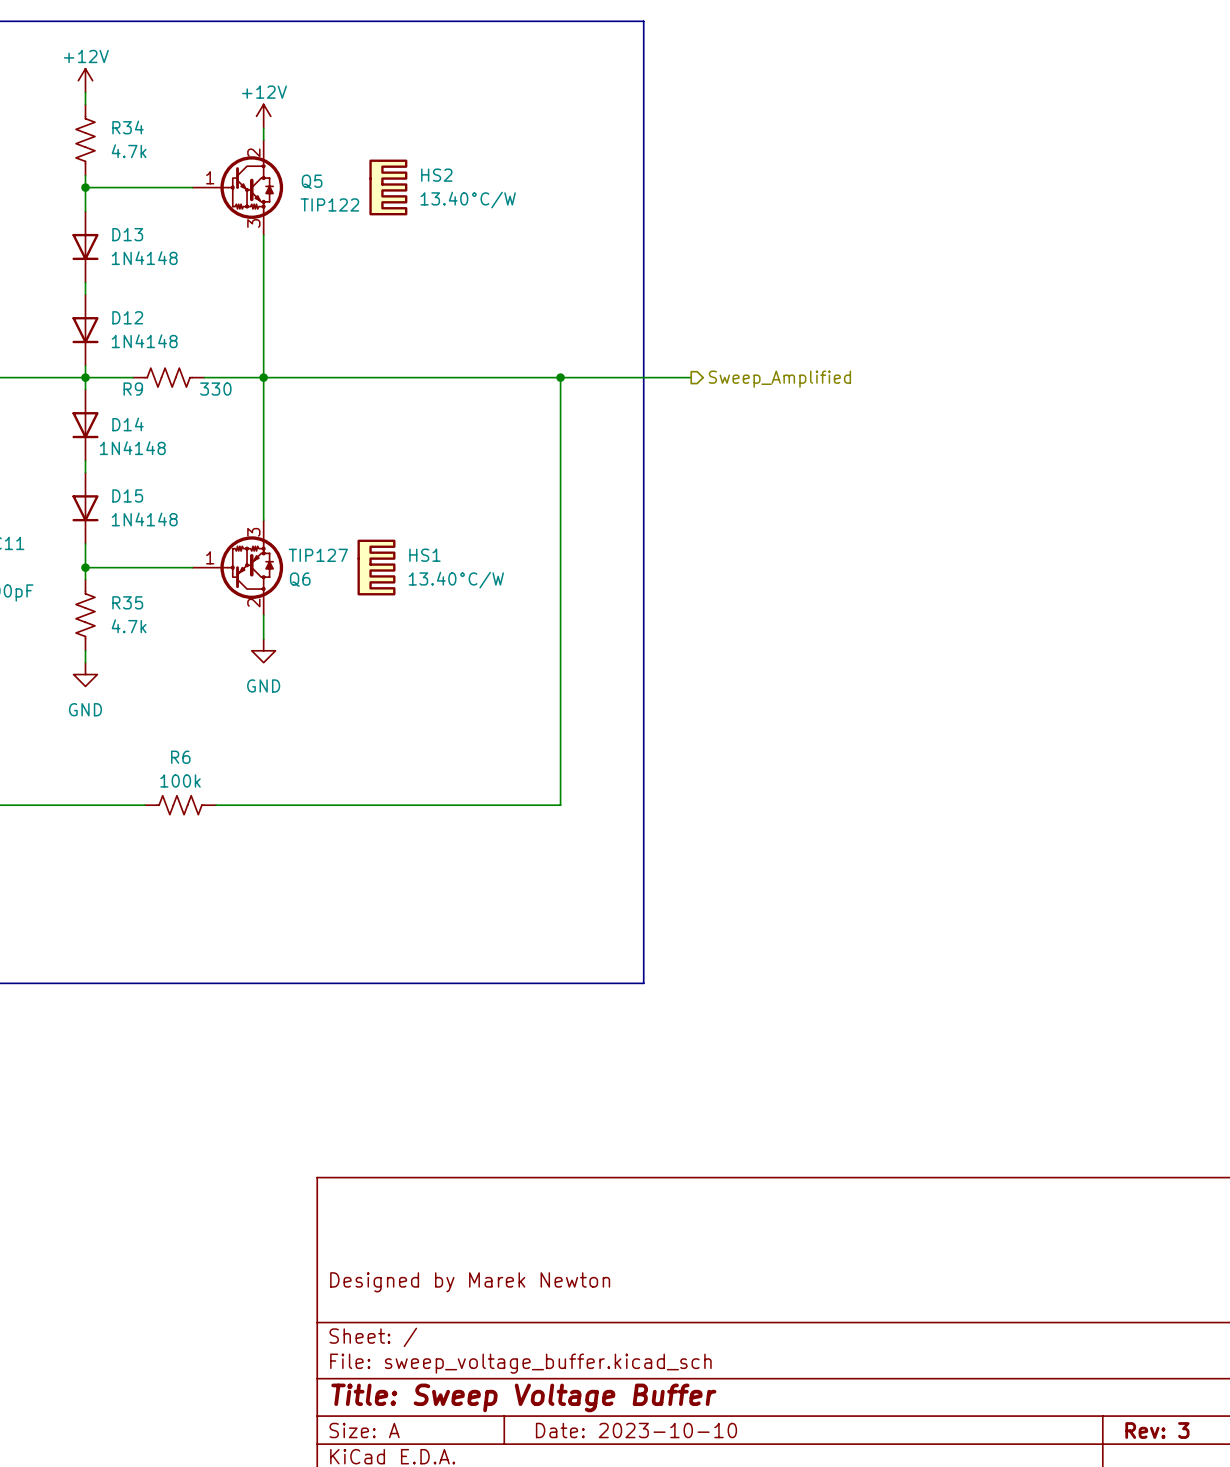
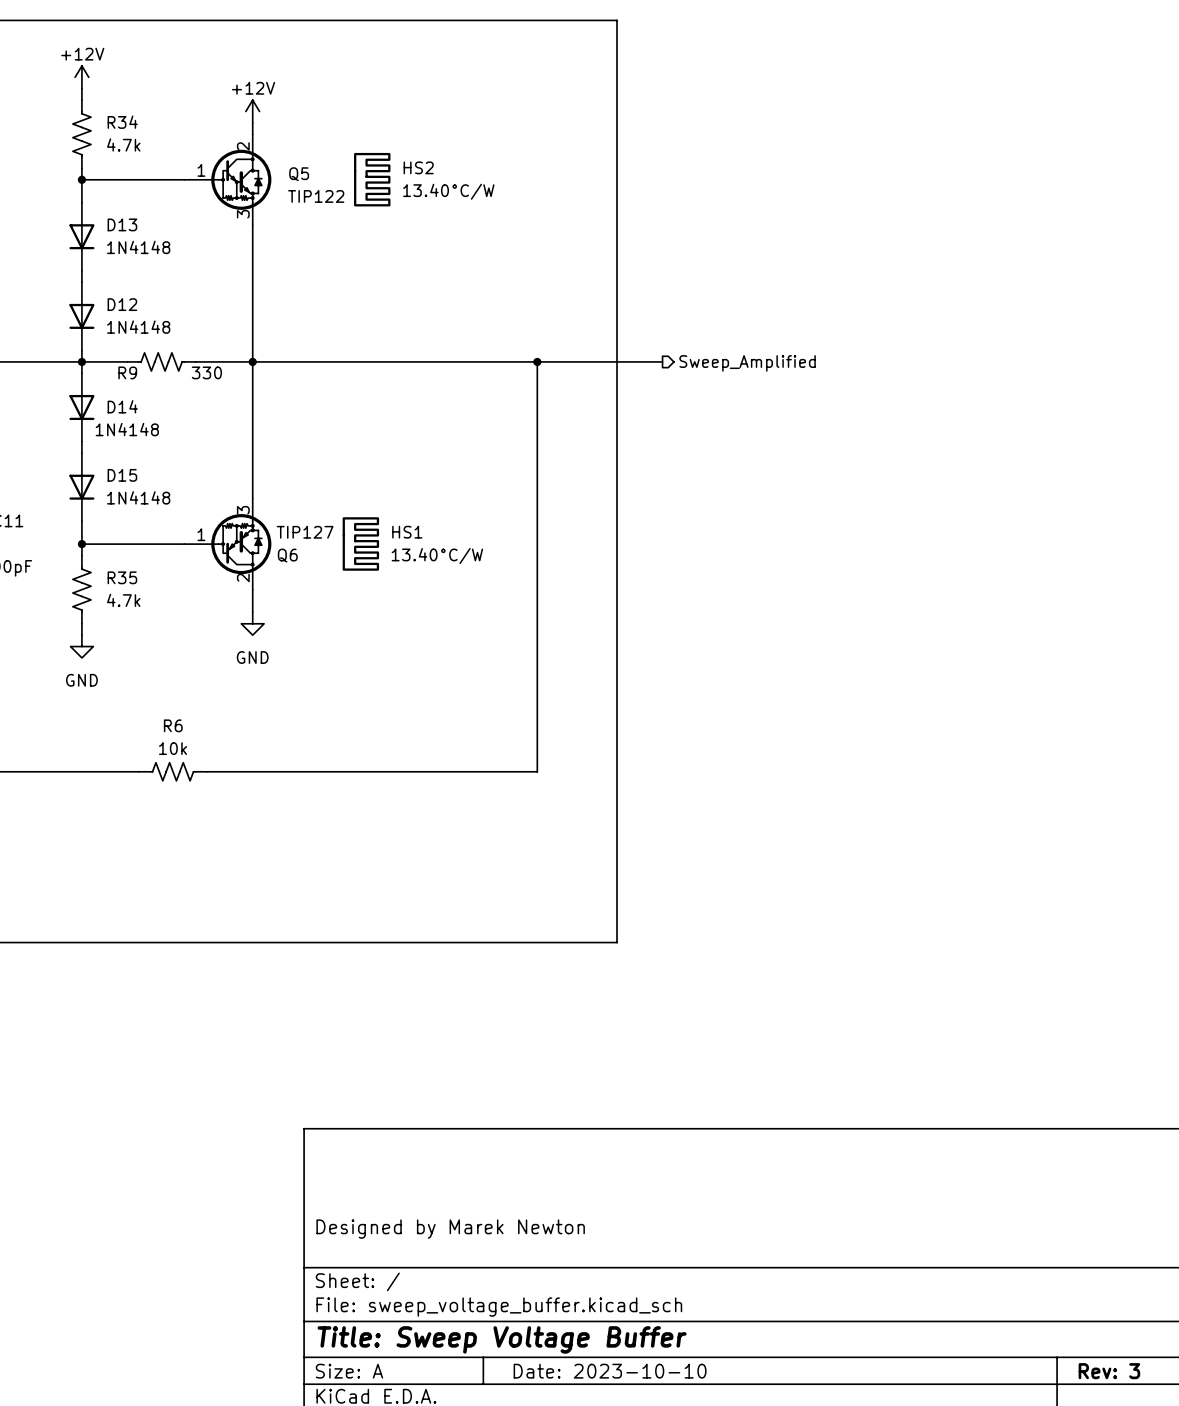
R6 value: 100k (180, 781) -> 10k (173, 748)

